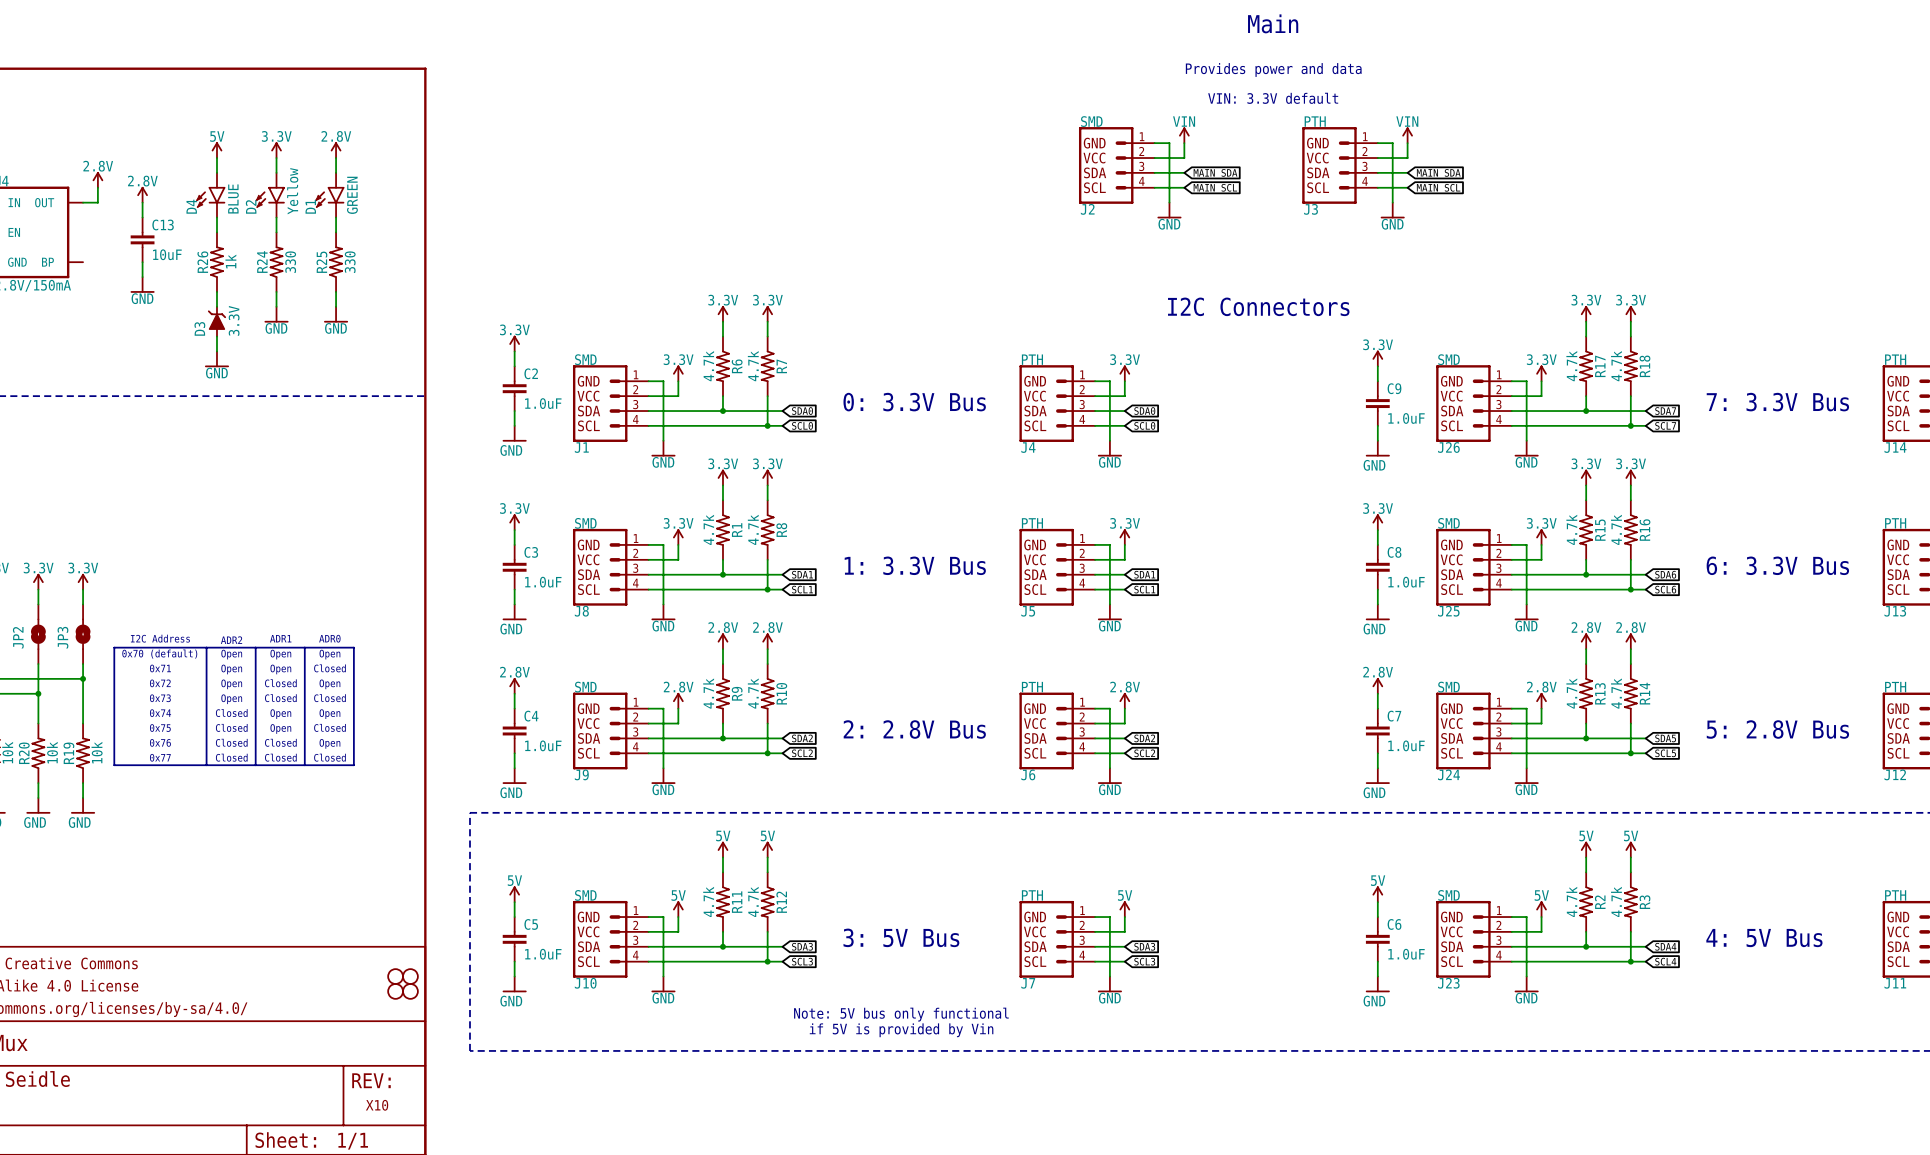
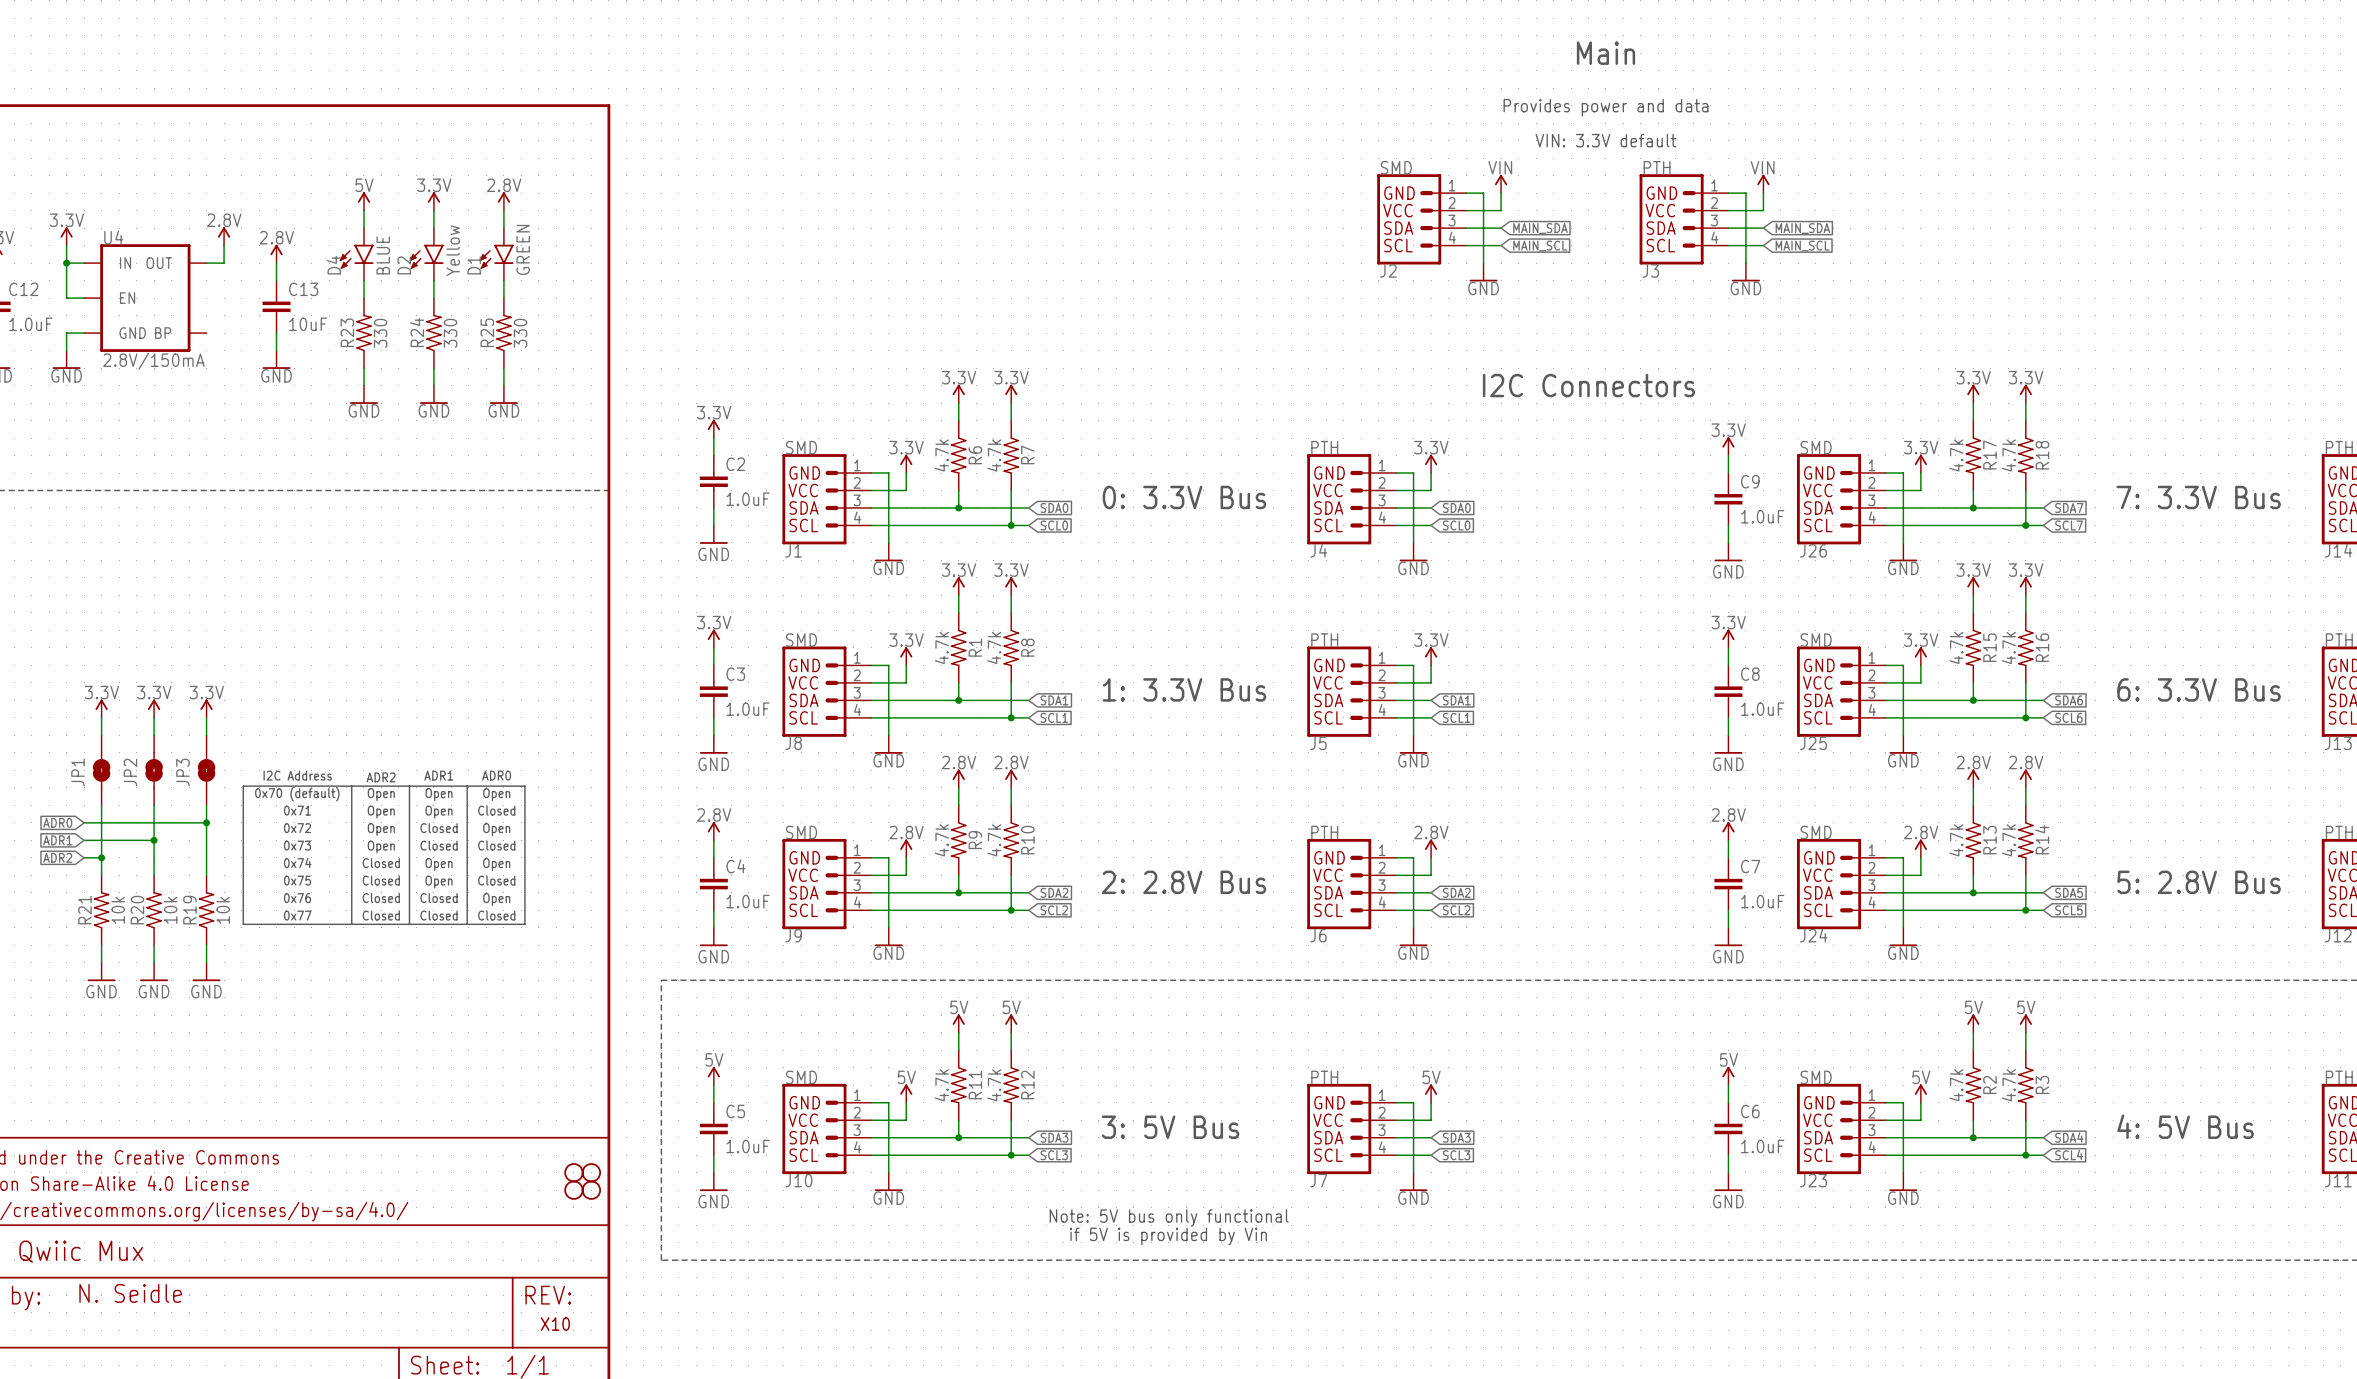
R26 value: 1k (230, 261) -> 330 (380, 333)
R26 name: R26 (202, 262) -> R23 (347, 332)
D3: 3.3V (216, 321) -> none
wire: (216, 336) (216, 351) -> none
power symbol position: GND (216, 359) -> GND (363, 394)

